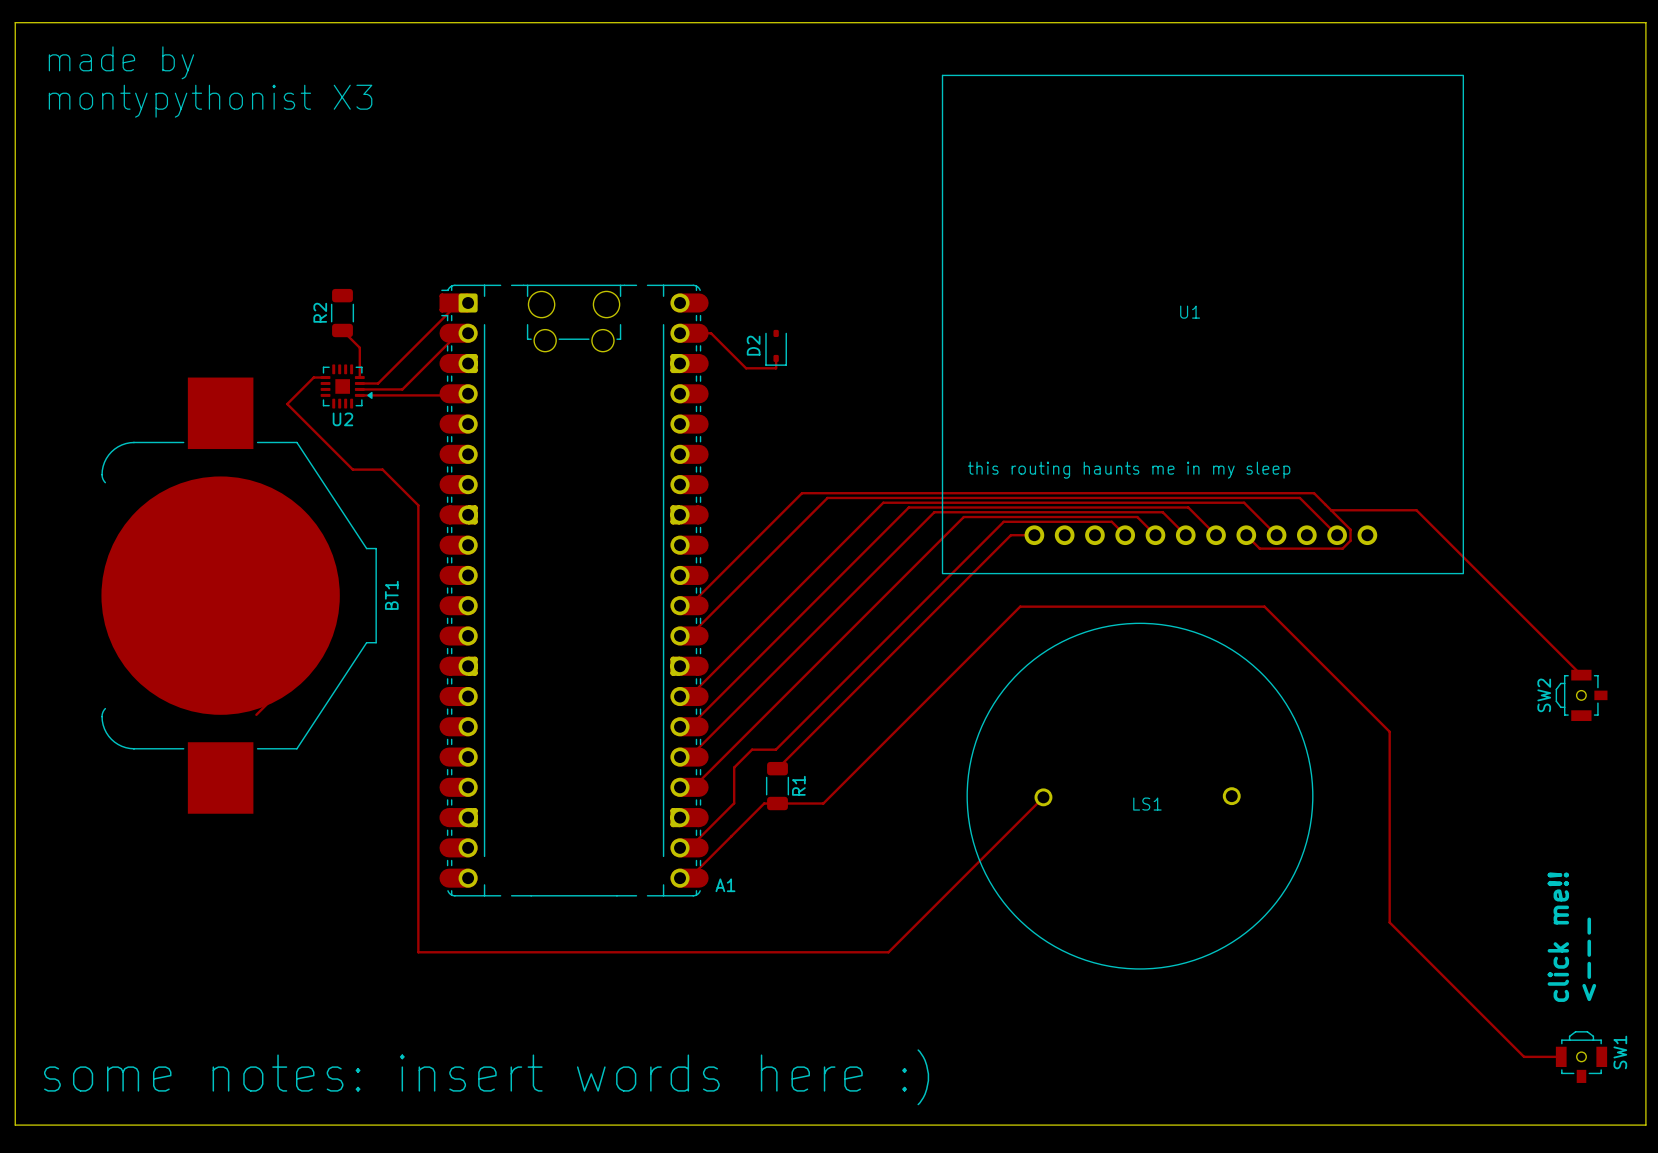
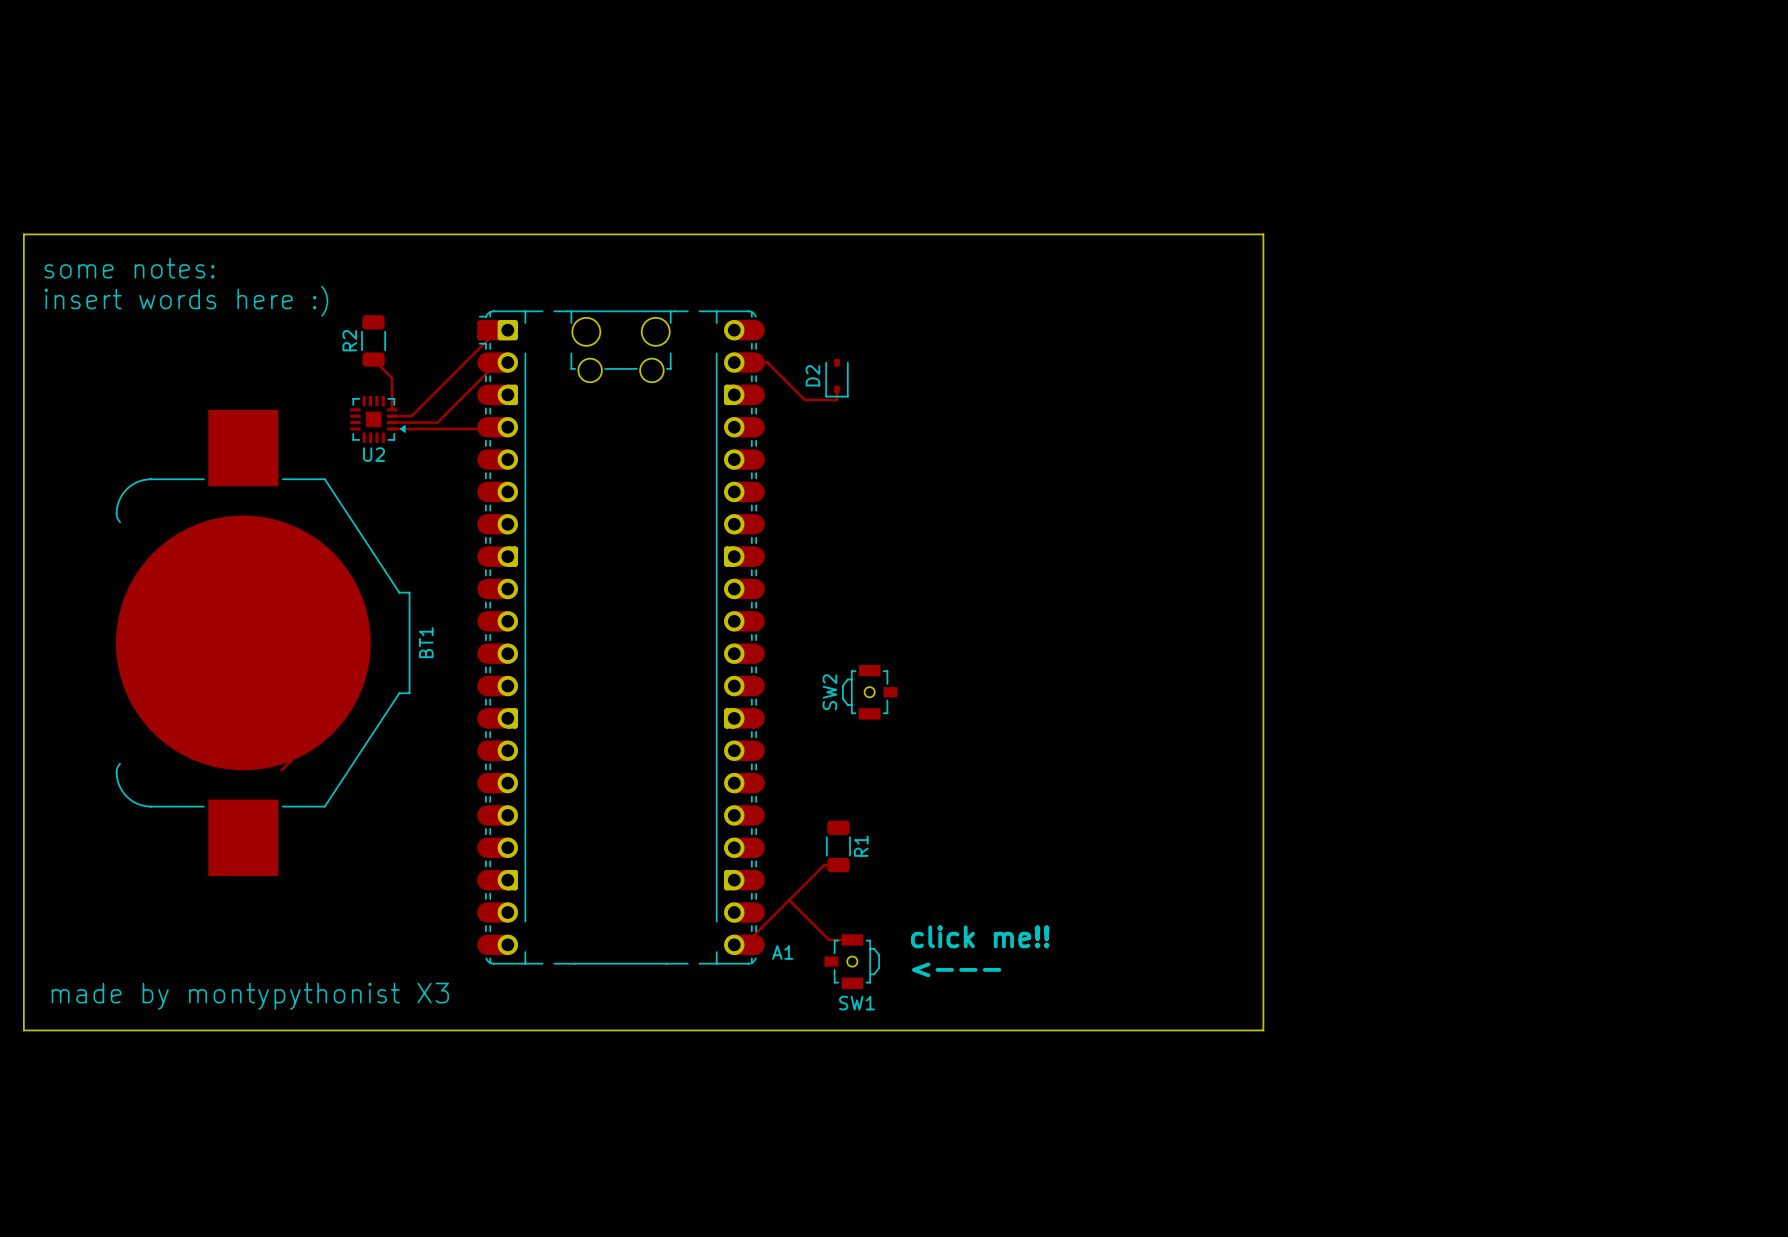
text: made by (121, 62) -> none
text: montypythonist X3 (210, 101) -> none
board edge: (15, 213) (15, 22) (1645, 22) (1645, 1125) (15, 1125) (15, 958) -> (23, 234) (1263, 234) (1263, 1030) (23, 1030)
text: none -> some notes: (129, 268)
text: none -> insert words here :) (186, 301)
U1: (1202, 324) -> none
track: (325, 377) (313, 377) (287, 404) (352, 469) (382, 469) (418, 505) (418, 952) (888, 952) (1043, 797) -> none
text: this routing haunts me in my sleep (1129, 470) -> none
track: (1331, 510) (1416, 510) (1581, 675) -> none
track: (1034, 535) (1010, 535) (777, 768) -> none
track: (1125, 535) (1111, 521) (1003, 521) (775, 749) (752, 749) (734, 767) (734, 803) (689, 847) -> none
track: (1155, 535) (1137, 517) (963, 517) (693, 787) (680, 787) -> none
track: (1185, 535) (1162, 512) (934, 512) (689, 757) -> none
track: (1216, 535) (1188, 507) (908, 507) (689, 726) -> none
track: (1246, 535) (1259, 548) (1342, 548) (1350, 540) (1350, 529) (1314, 493) (802, 493) (689, 605) -> none
track: (1276, 535) (1244, 502) (883, 502) (689, 696) -> none
track: (1337, 535) (1299, 497) (827, 497) (689, 635) -> none
SW2 position: (1581, 695) -> (869, 692)
LS1: (1139, 796) -> none
track: (777, 803) (823, 803) (1020, 606) (1264, 606) (1389, 731) (1389, 922) (1524, 1056) (1561, 1056) -> none
track: none -> (789, 900) (829, 939) (852, 939)
text: none -> click me!! (980, 936)
text: none -> <--- (956, 969)
text: none -> made by montypythonist X3 (250, 996)
text: click me!! (1558, 937) -> none
text: <--- (1589, 959) -> none
SW1 rotation: 0° (1581, 1057) -> 90° clockwise (852, 961)
SW1 position: (1581, 1057) -> (852, 961)
text: some notes: insert words here :) (486, 1077) -> none

